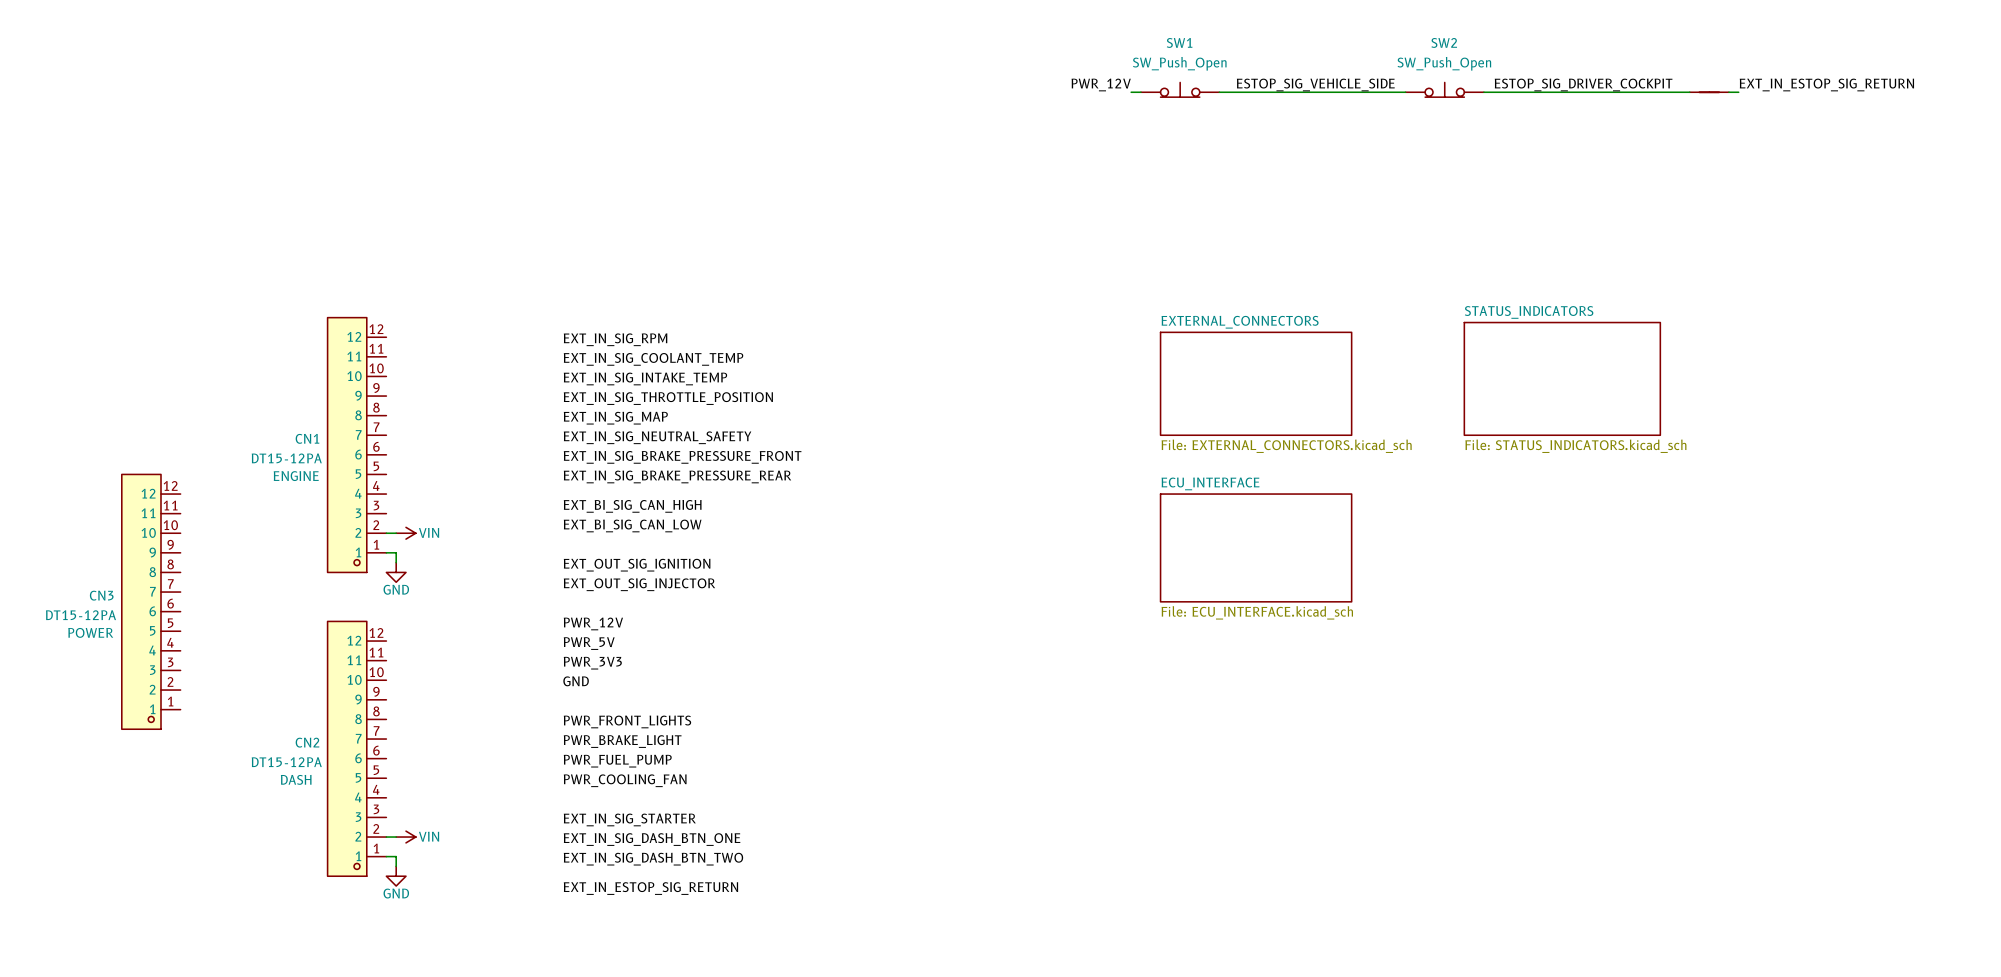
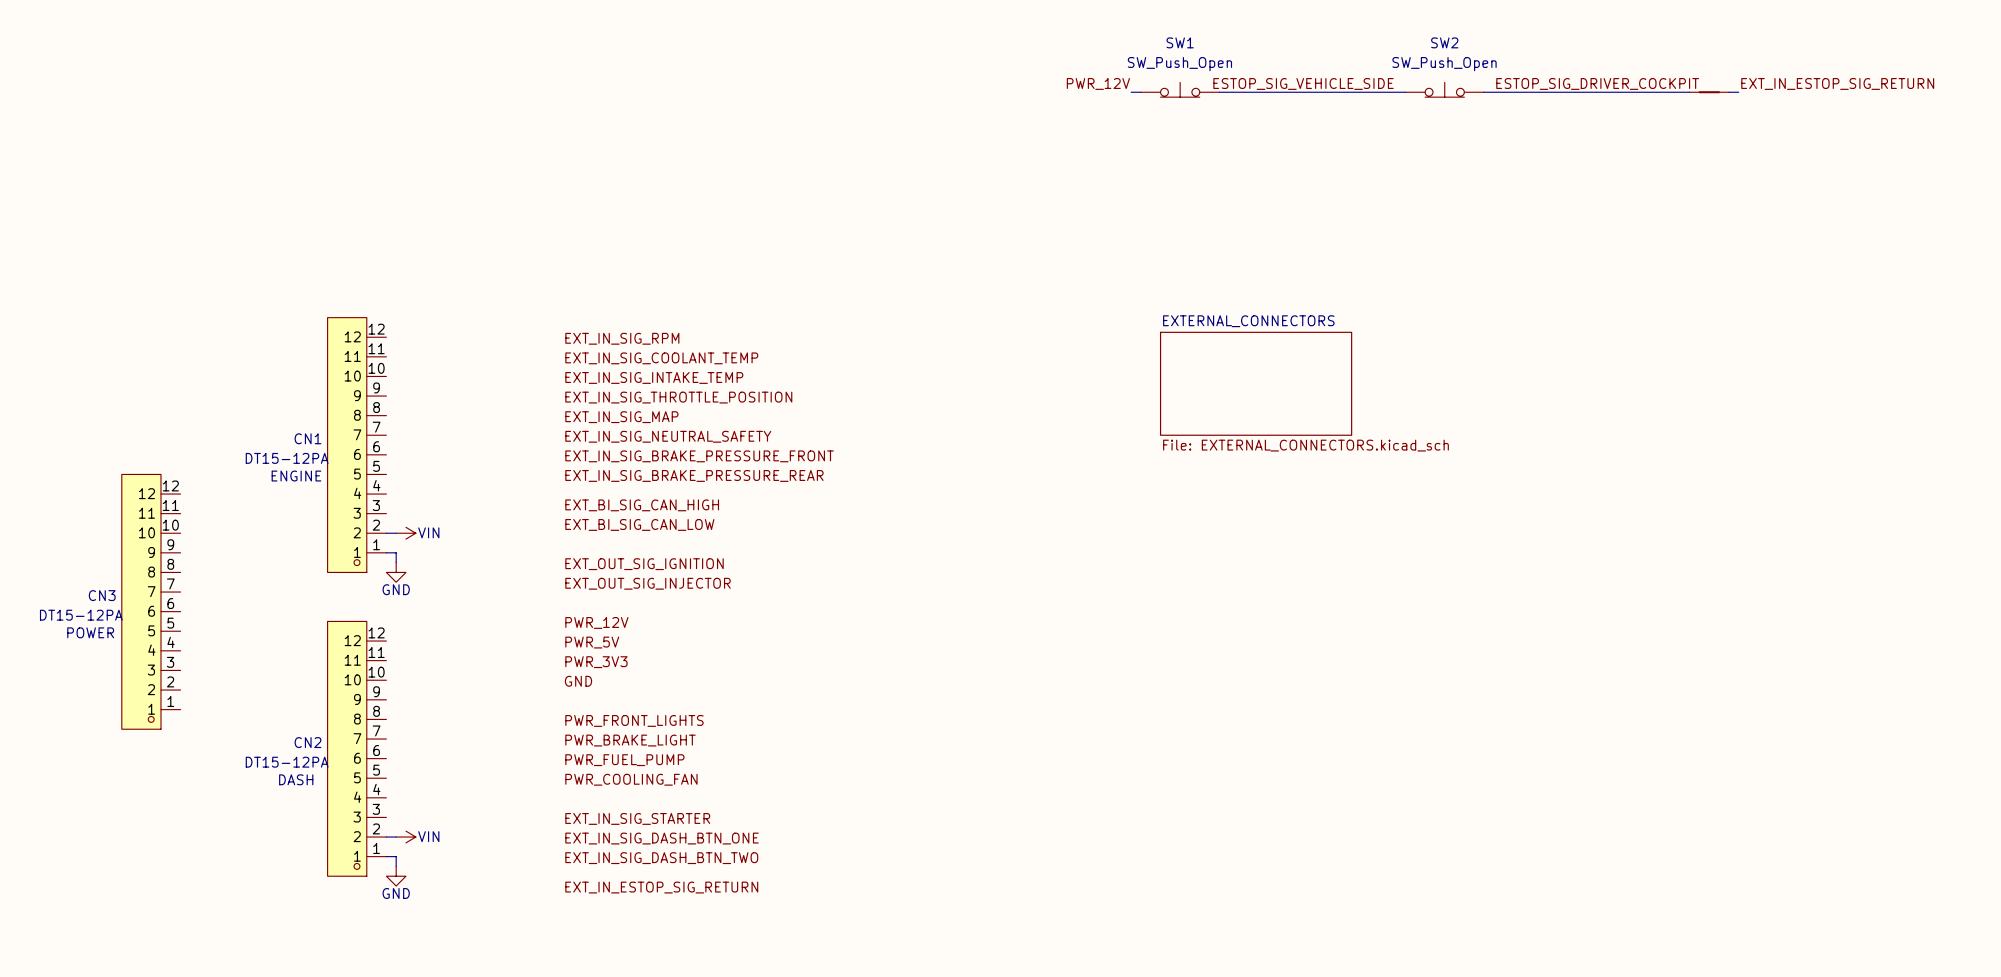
sheet STATUS_INDICATORS: File: STATUS_INDICATORS.kicad_sch (1562, 378) -> none
sheet ECU_INTERFACE: File: ECU_INTERFACE.kicad_sch (1256, 547) -> none

